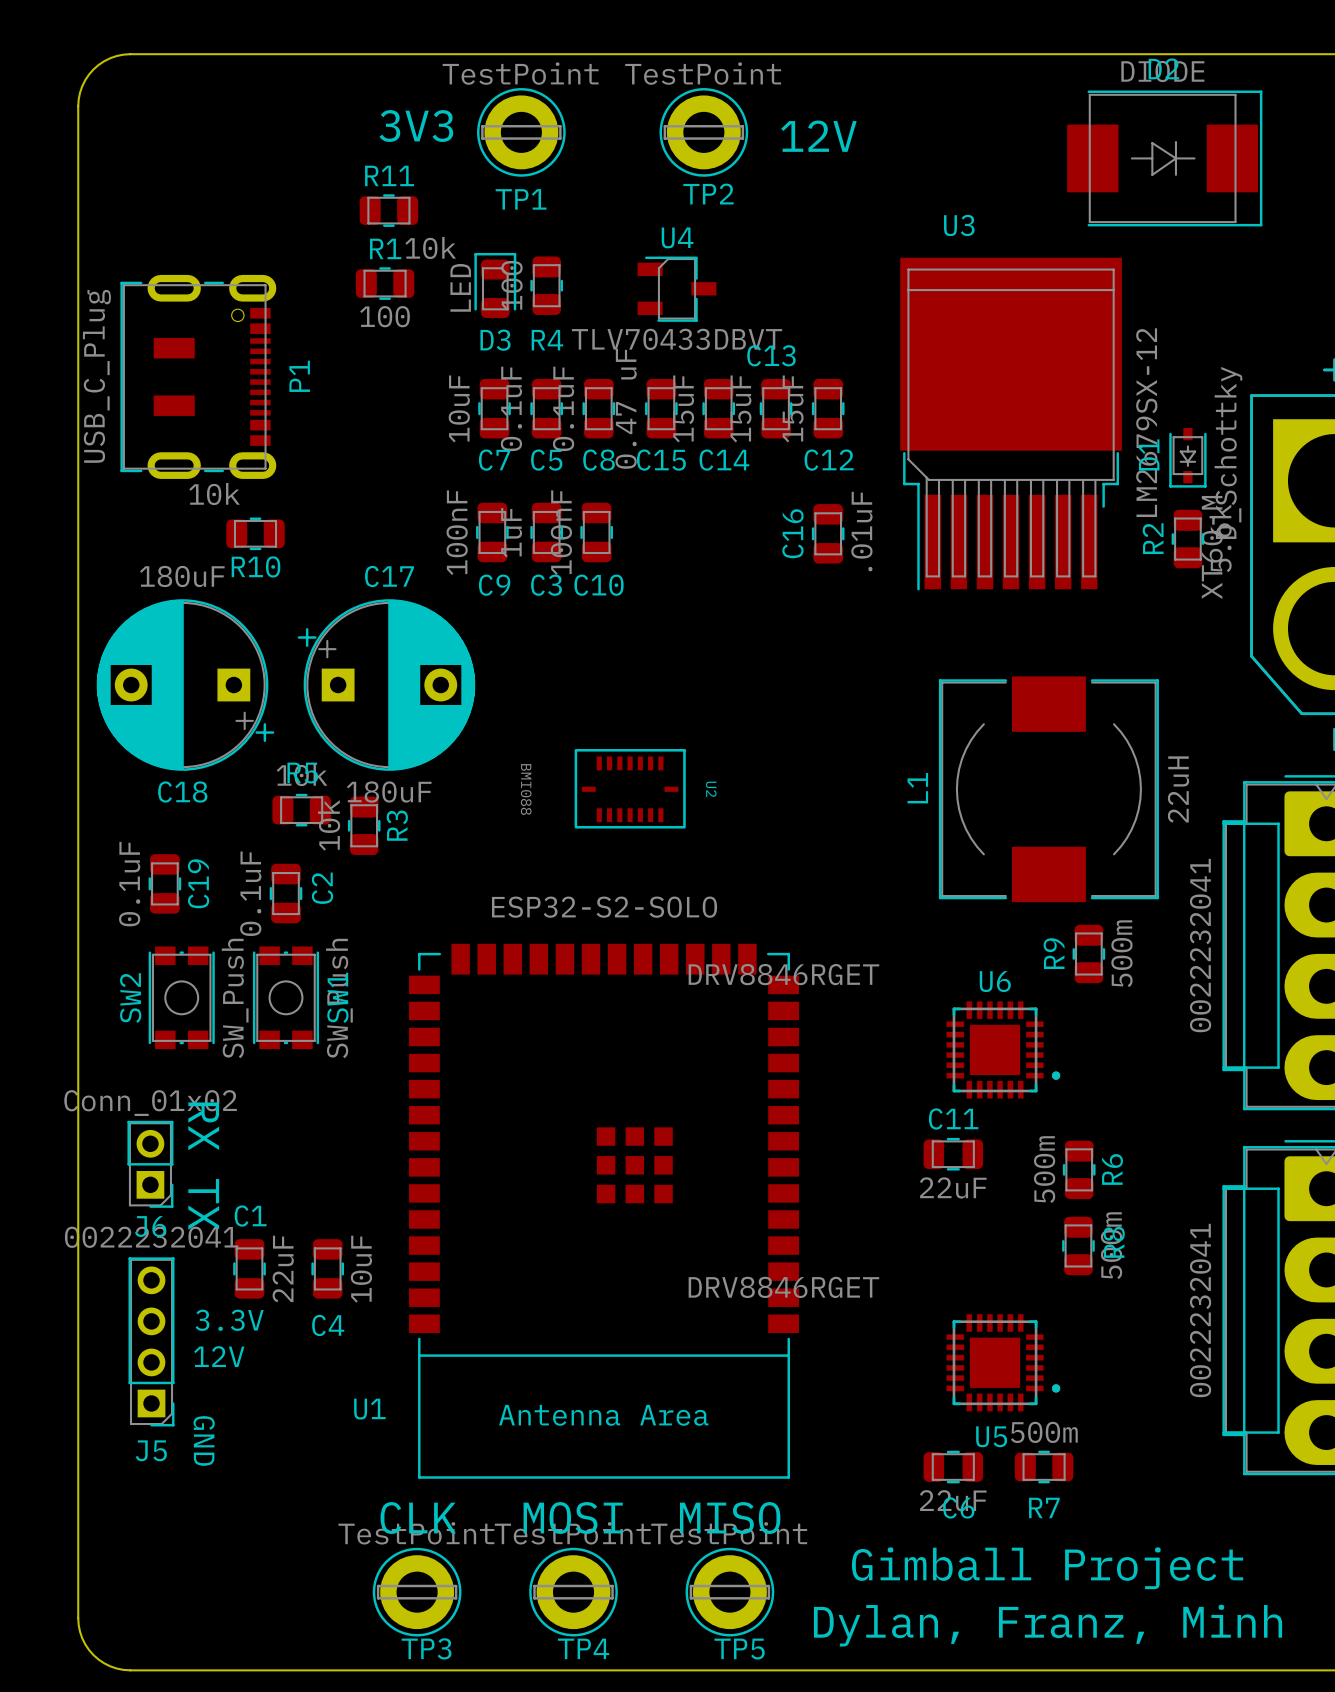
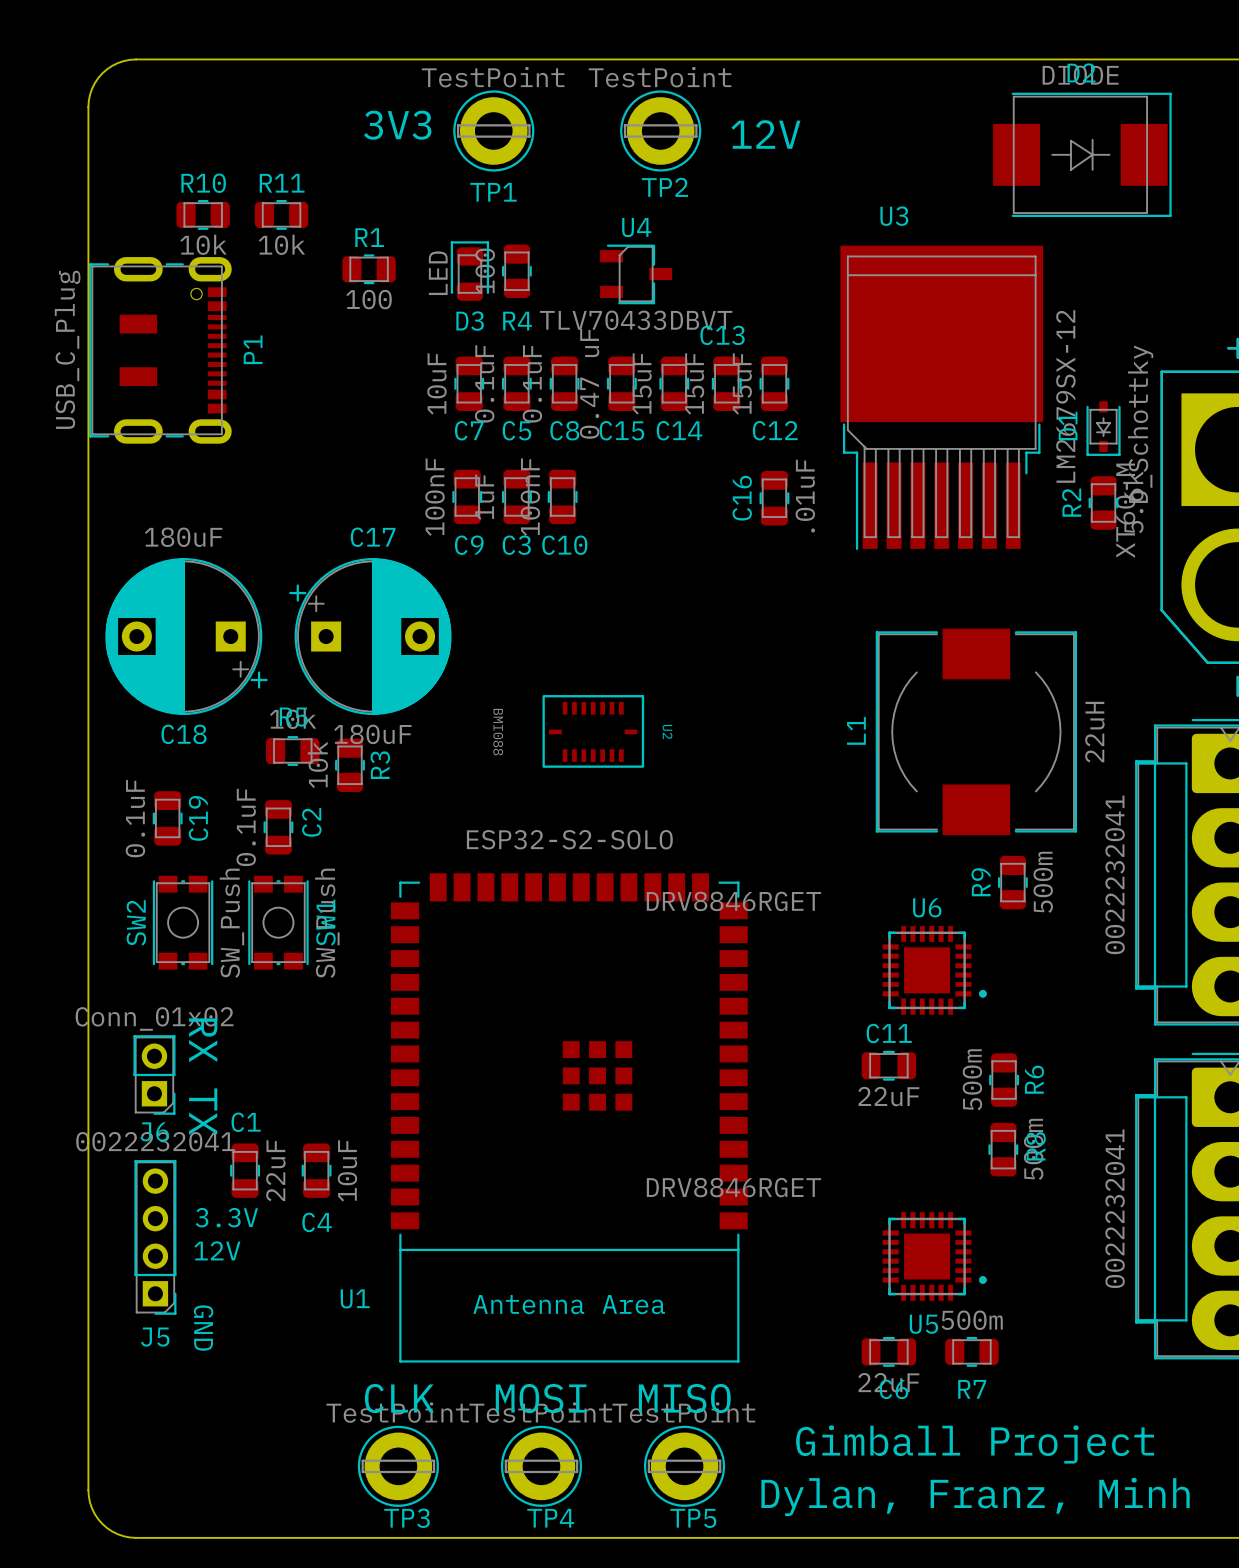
R11 position: (388, 210) -> (281, 214)
R11 value position: 10k (430, 247) -> 10k (281, 244)
P1 position: (198, 376) -> (160, 350)
R10 value position: 10k (214, 494) -> 10k (203, 244)
R10 position: (255, 533) -> (203, 214)
R10 name position: R10 (256, 566) -> R10 (203, 183)

